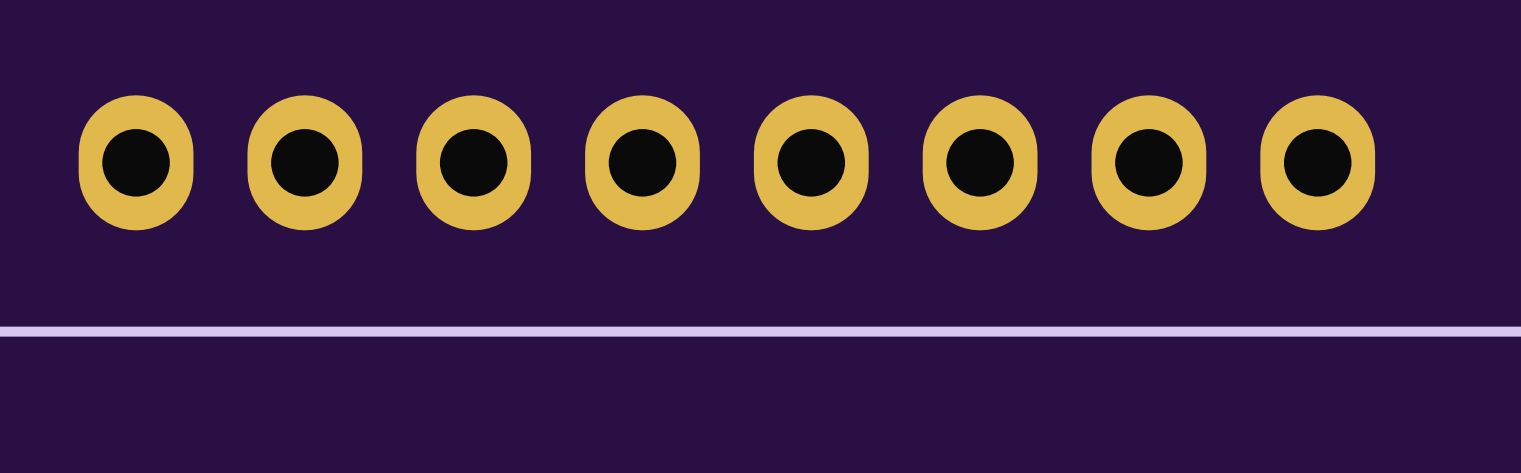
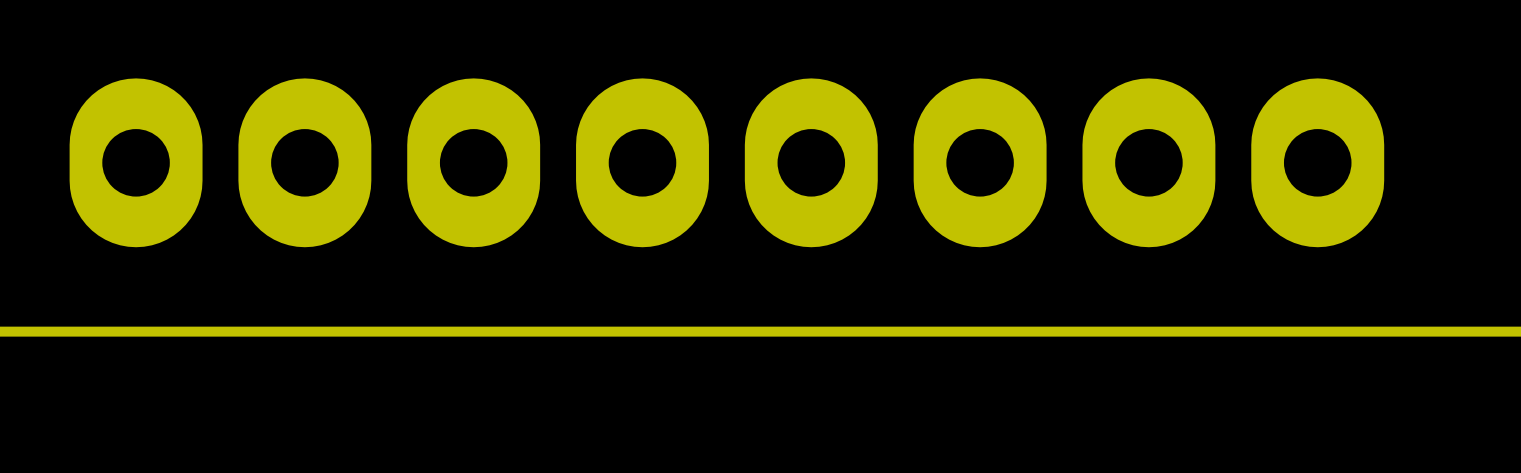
part footprint: [78, 95, 1376, 231] -> [69, 78, 1385, 248]

